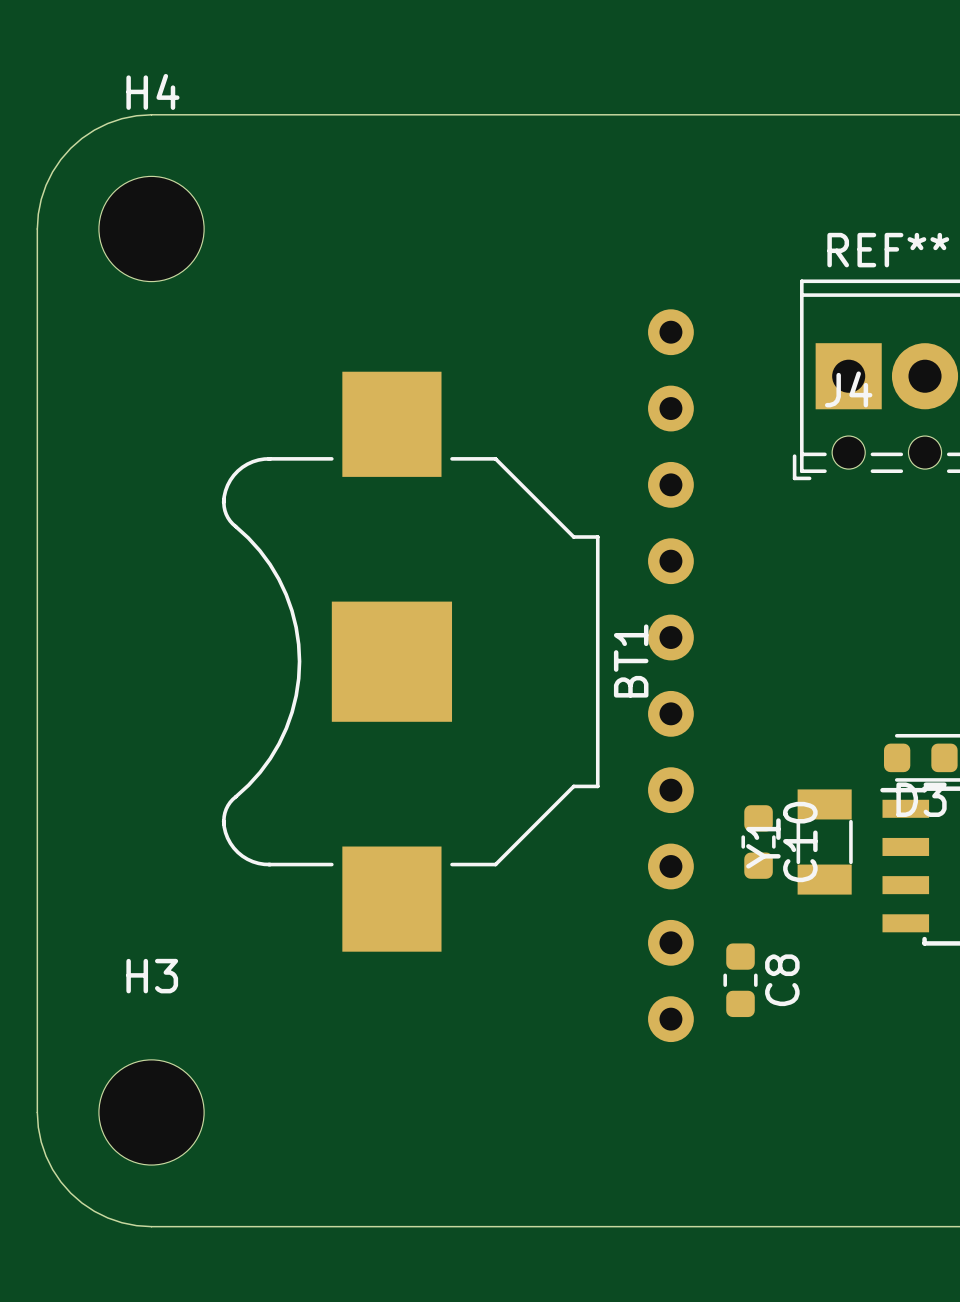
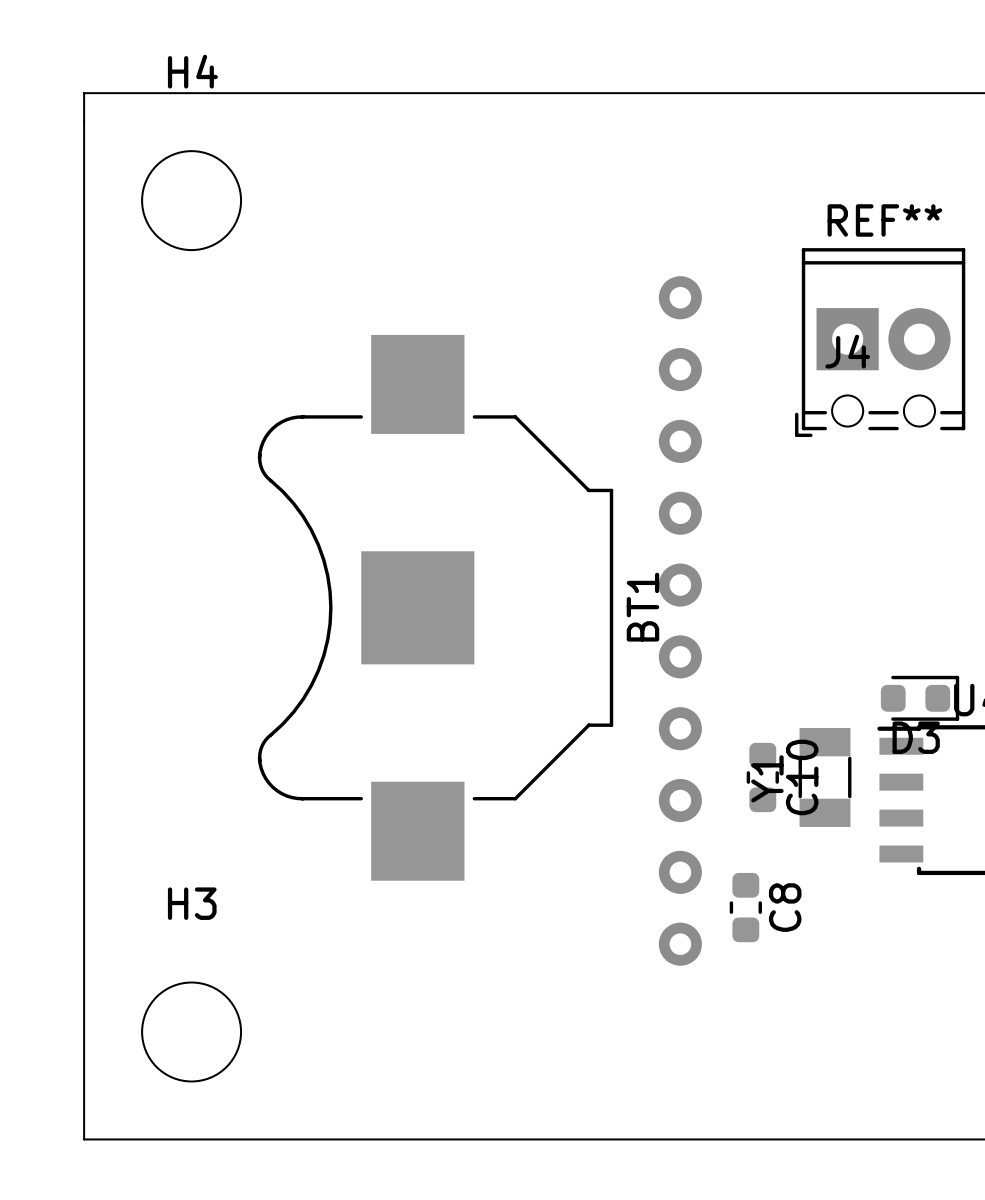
board edge: (151, 114) (136, 115) (107, 123) (94, 130) (70, 148) (60, 159) (46, 185) (41, 199) (37, 228) -> (191, 93) (84, 93) (84, 200)
board edge: (37, 1112) (41, 1142) (46, 1156) (60, 1181) (70, 1193) (94, 1211) (107, 1217) (121, 1222) (151, 1226) -> (84, 1031) (84, 1139) (191, 1139)

